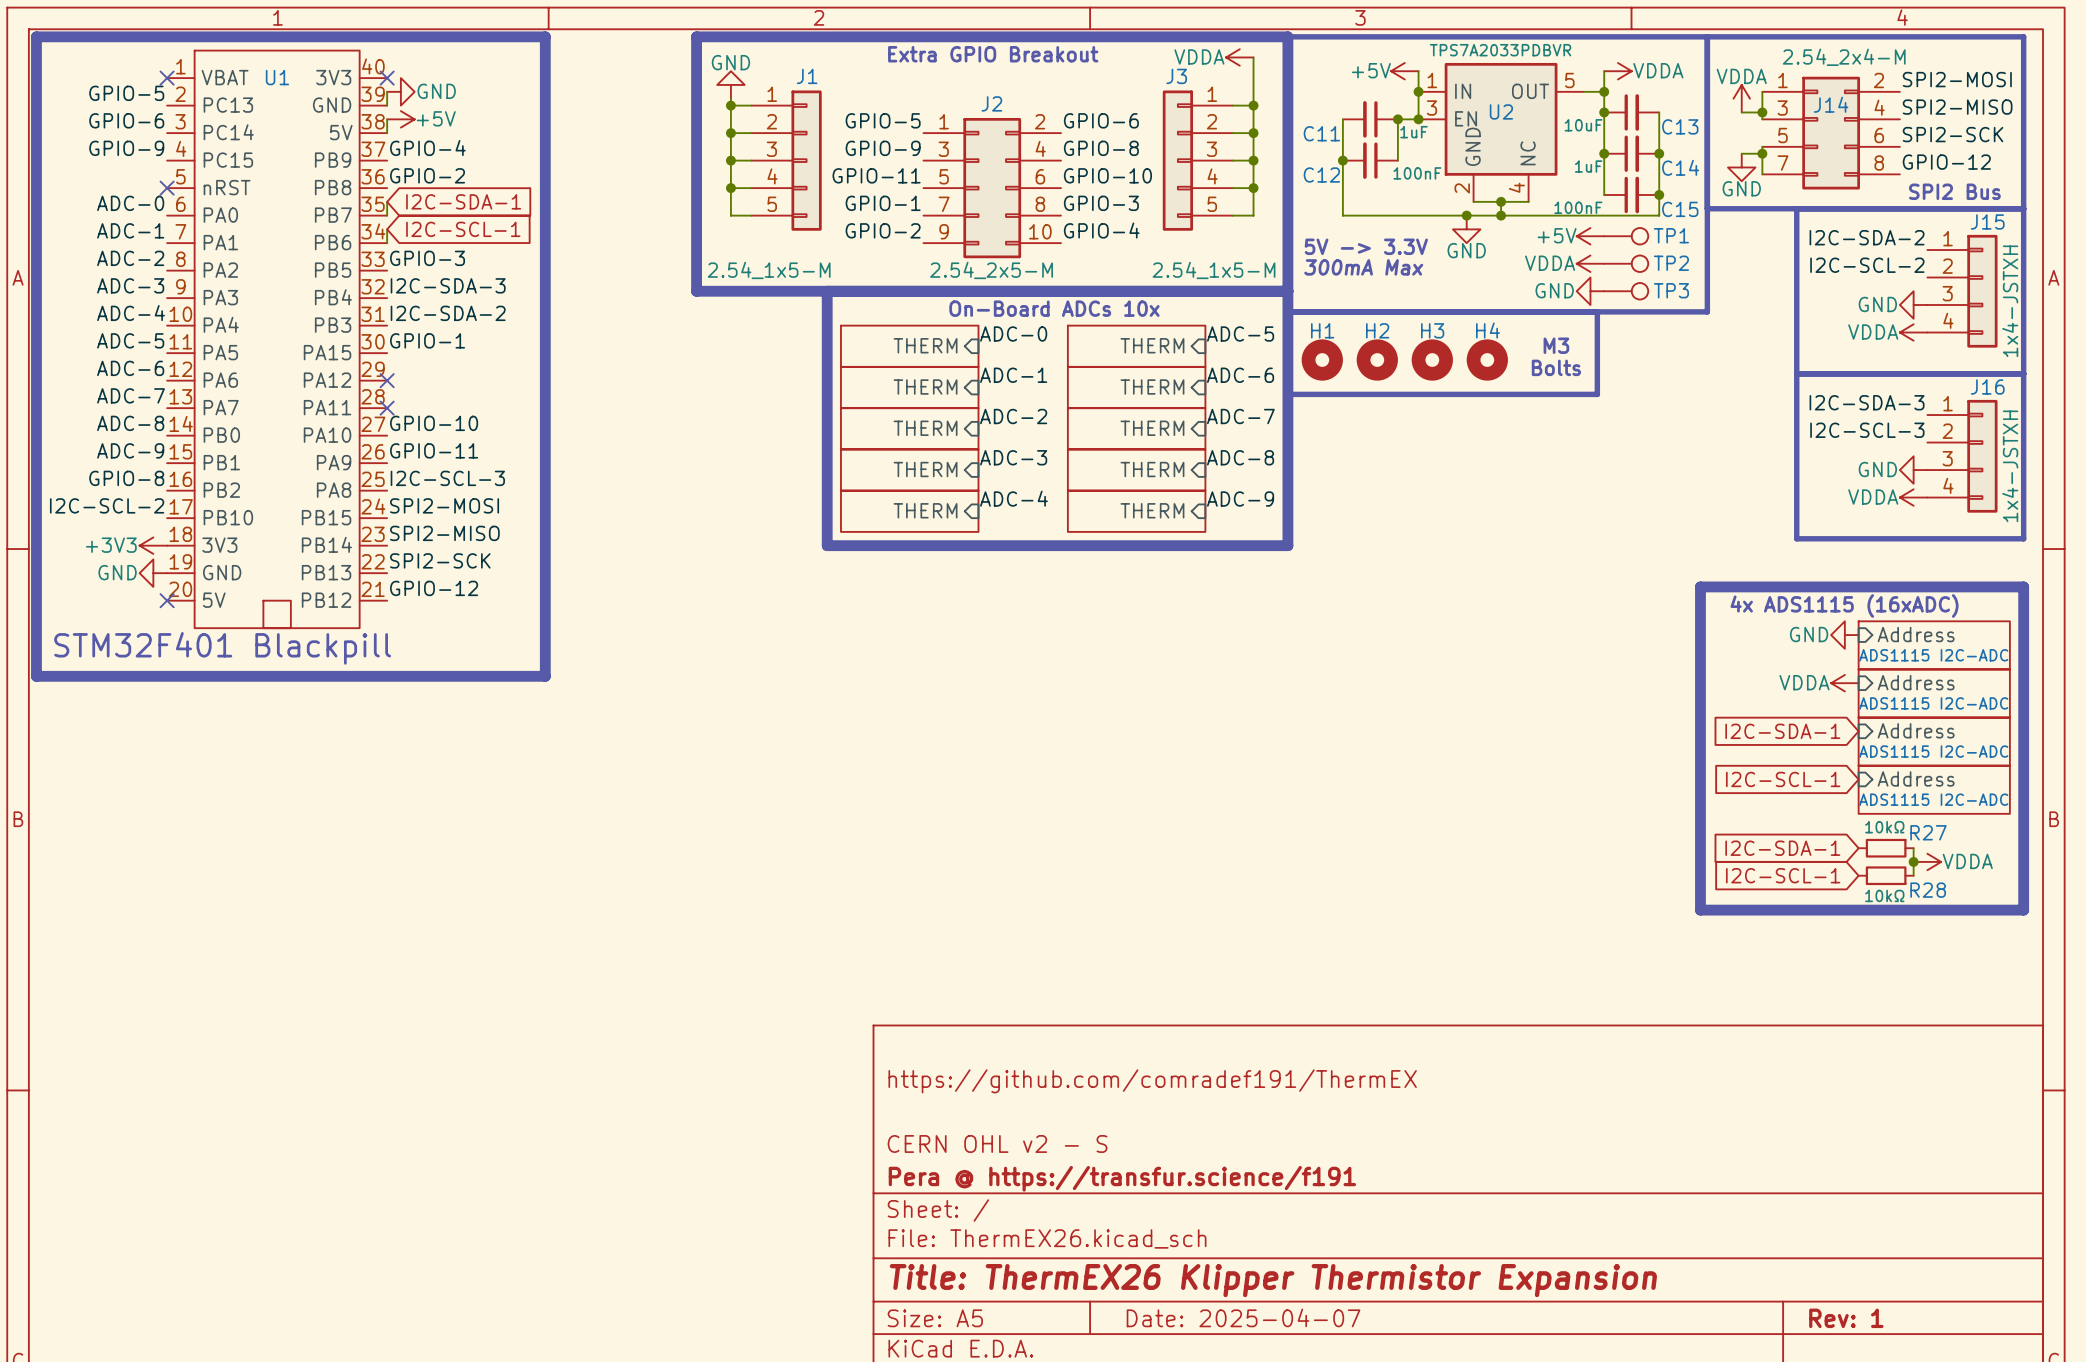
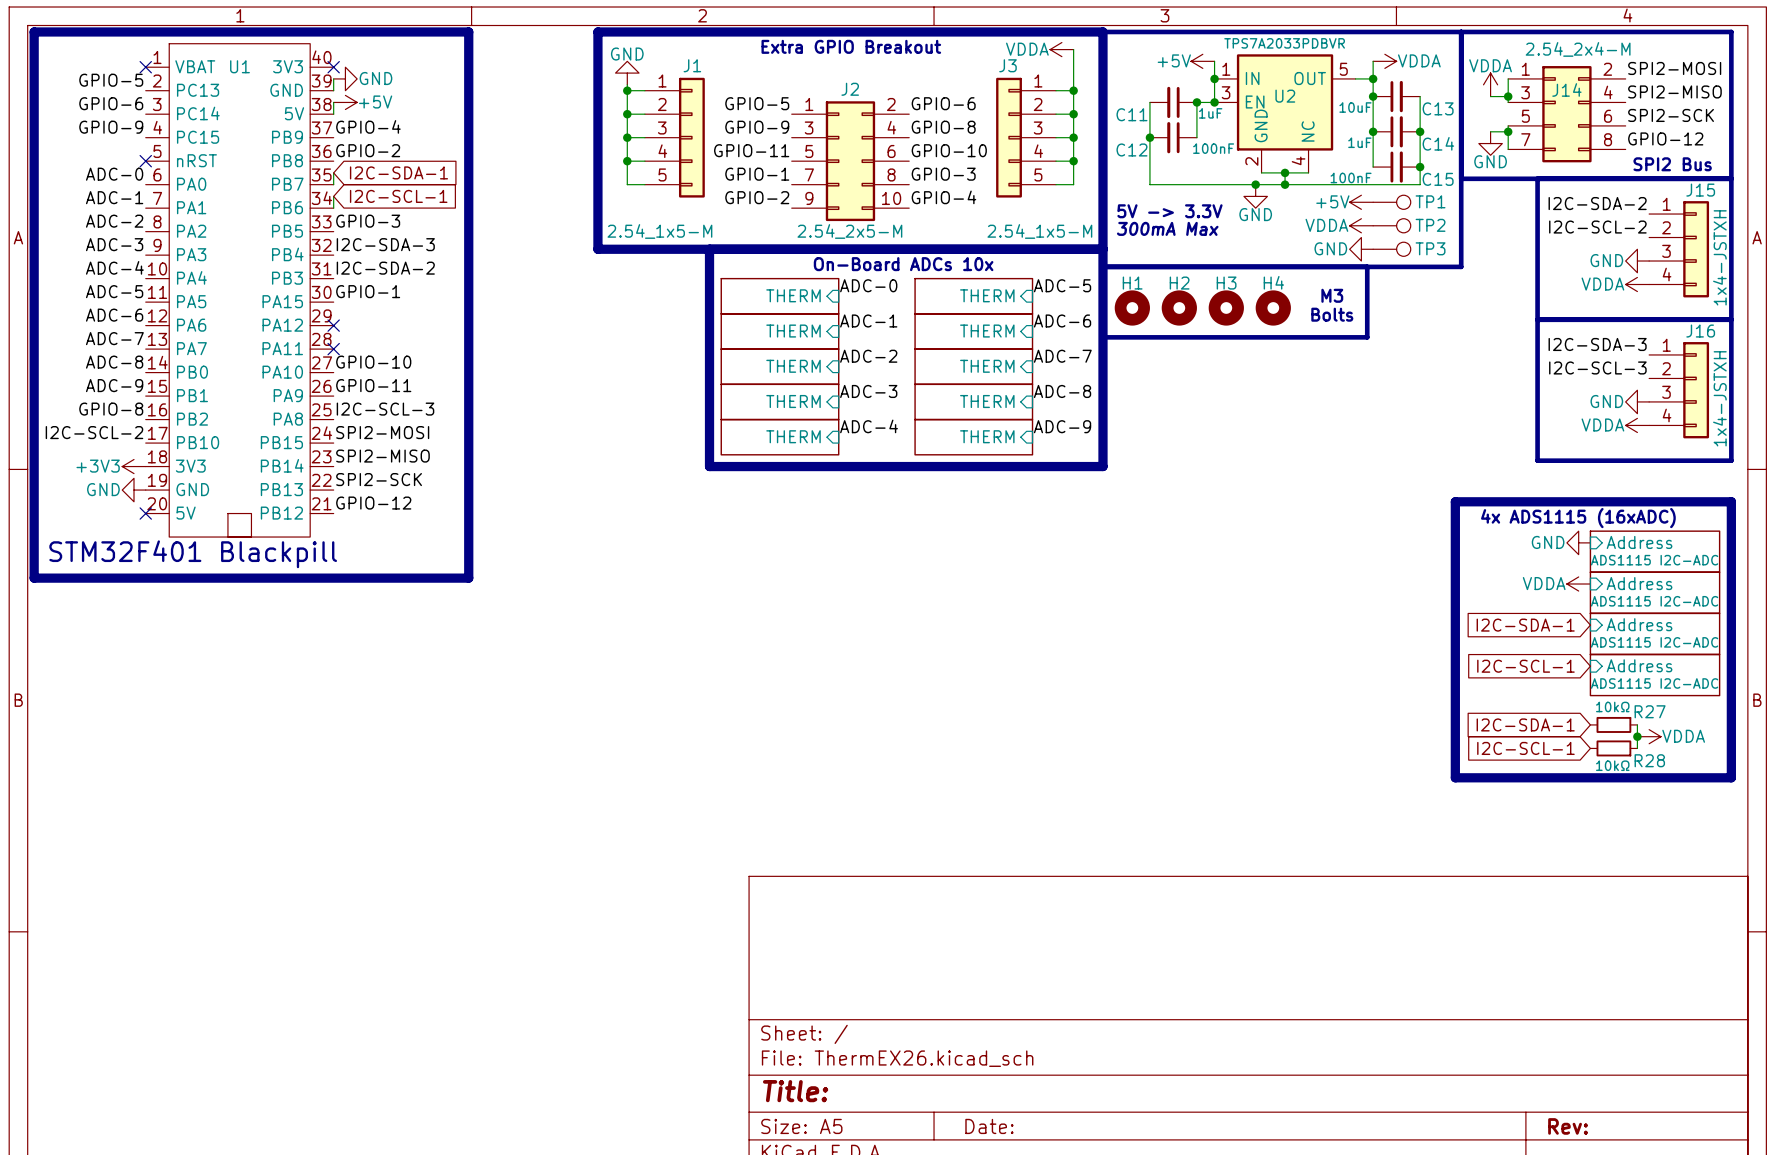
title block: https://github.com/comradef191/ThermEX (1152, 1081) -> none
title block: CERN OHL v2 - S (997, 1143) -> none
title block: Pera @ https://transfur.science/f191 (1122, 1178) -> none
title block: Title: ThermEX26 Klipper Thermistor Expansion (1273, 1280) -> Title: (795, 1091)
title block: Date: 2025-04-07 (1243, 1317) -> Date: (989, 1126)
title block: Rev: 1 (1846, 1318) -> Rev: (1568, 1126)

